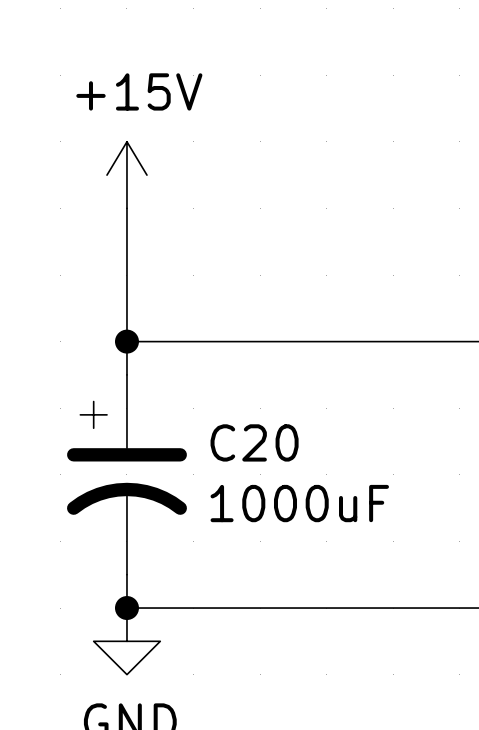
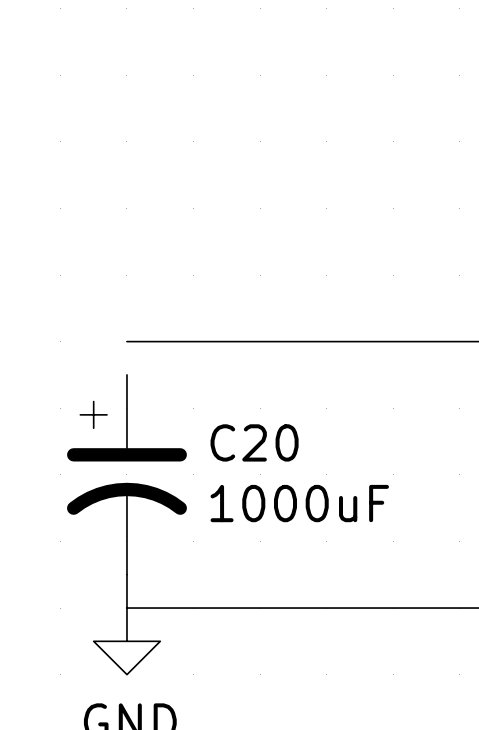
power symbol: +15V (126, 175) -> none
wire: (126, 208) (126, 374) -> none
junction: (126, 341) -> none
junction: (126, 608) -> none

